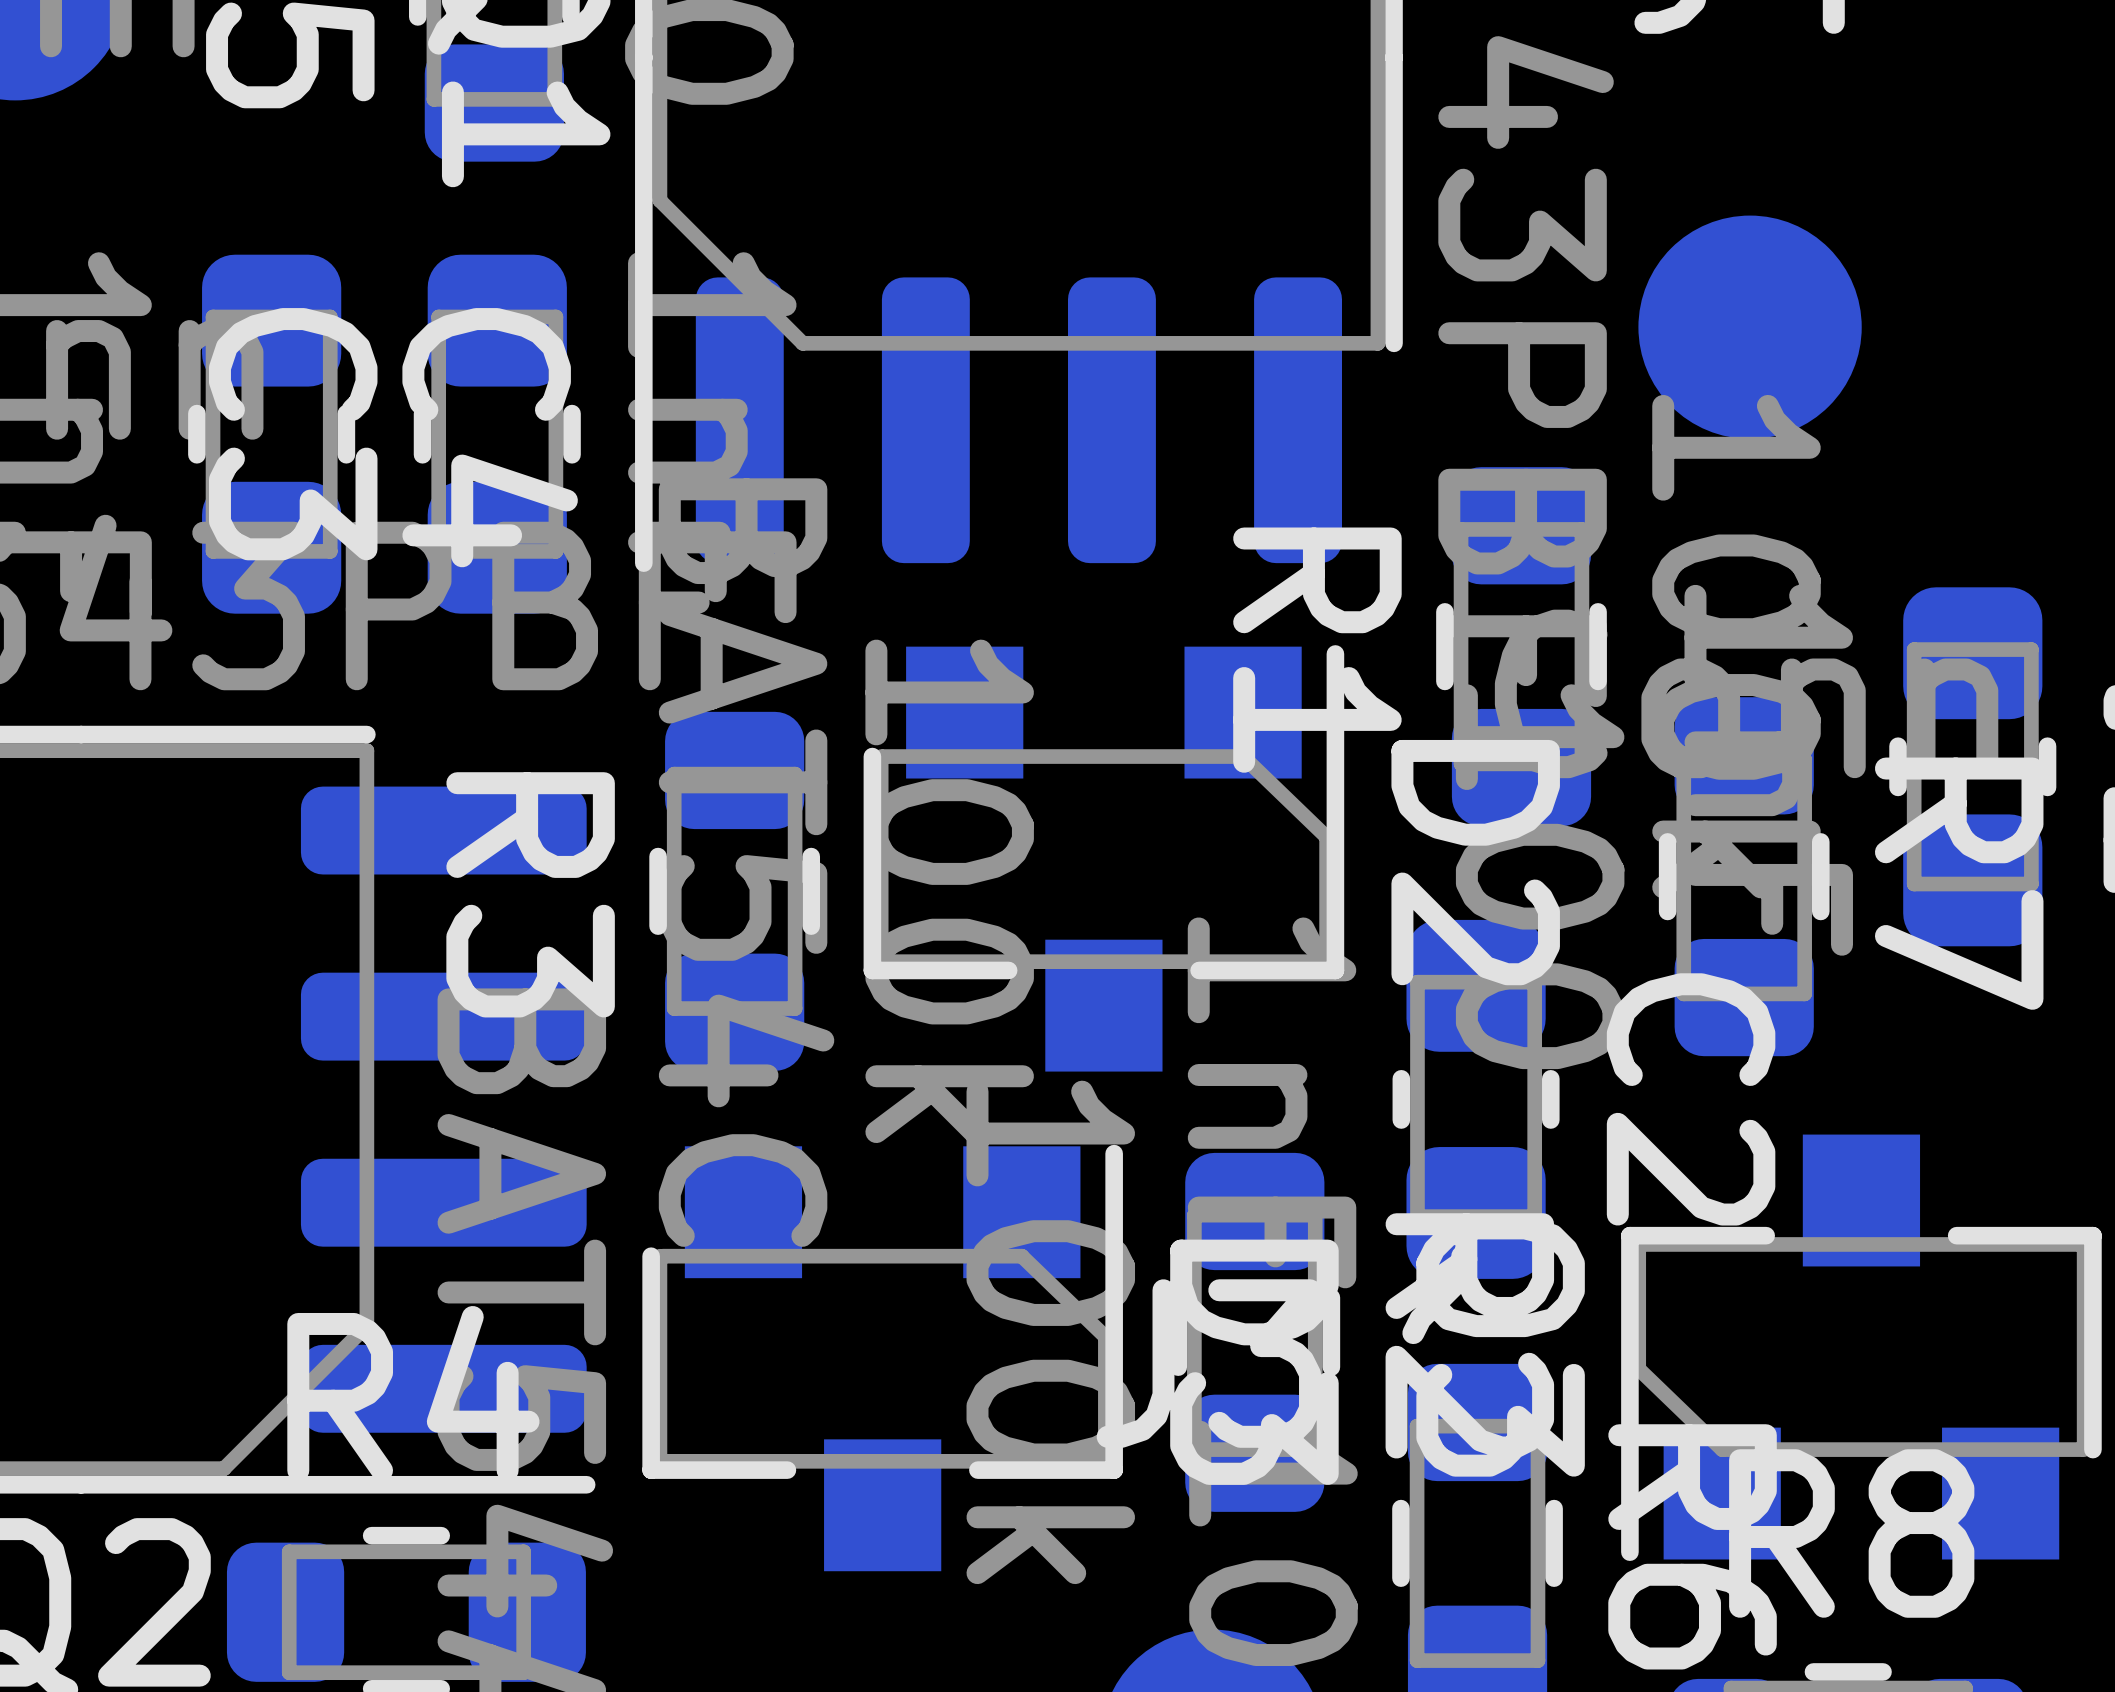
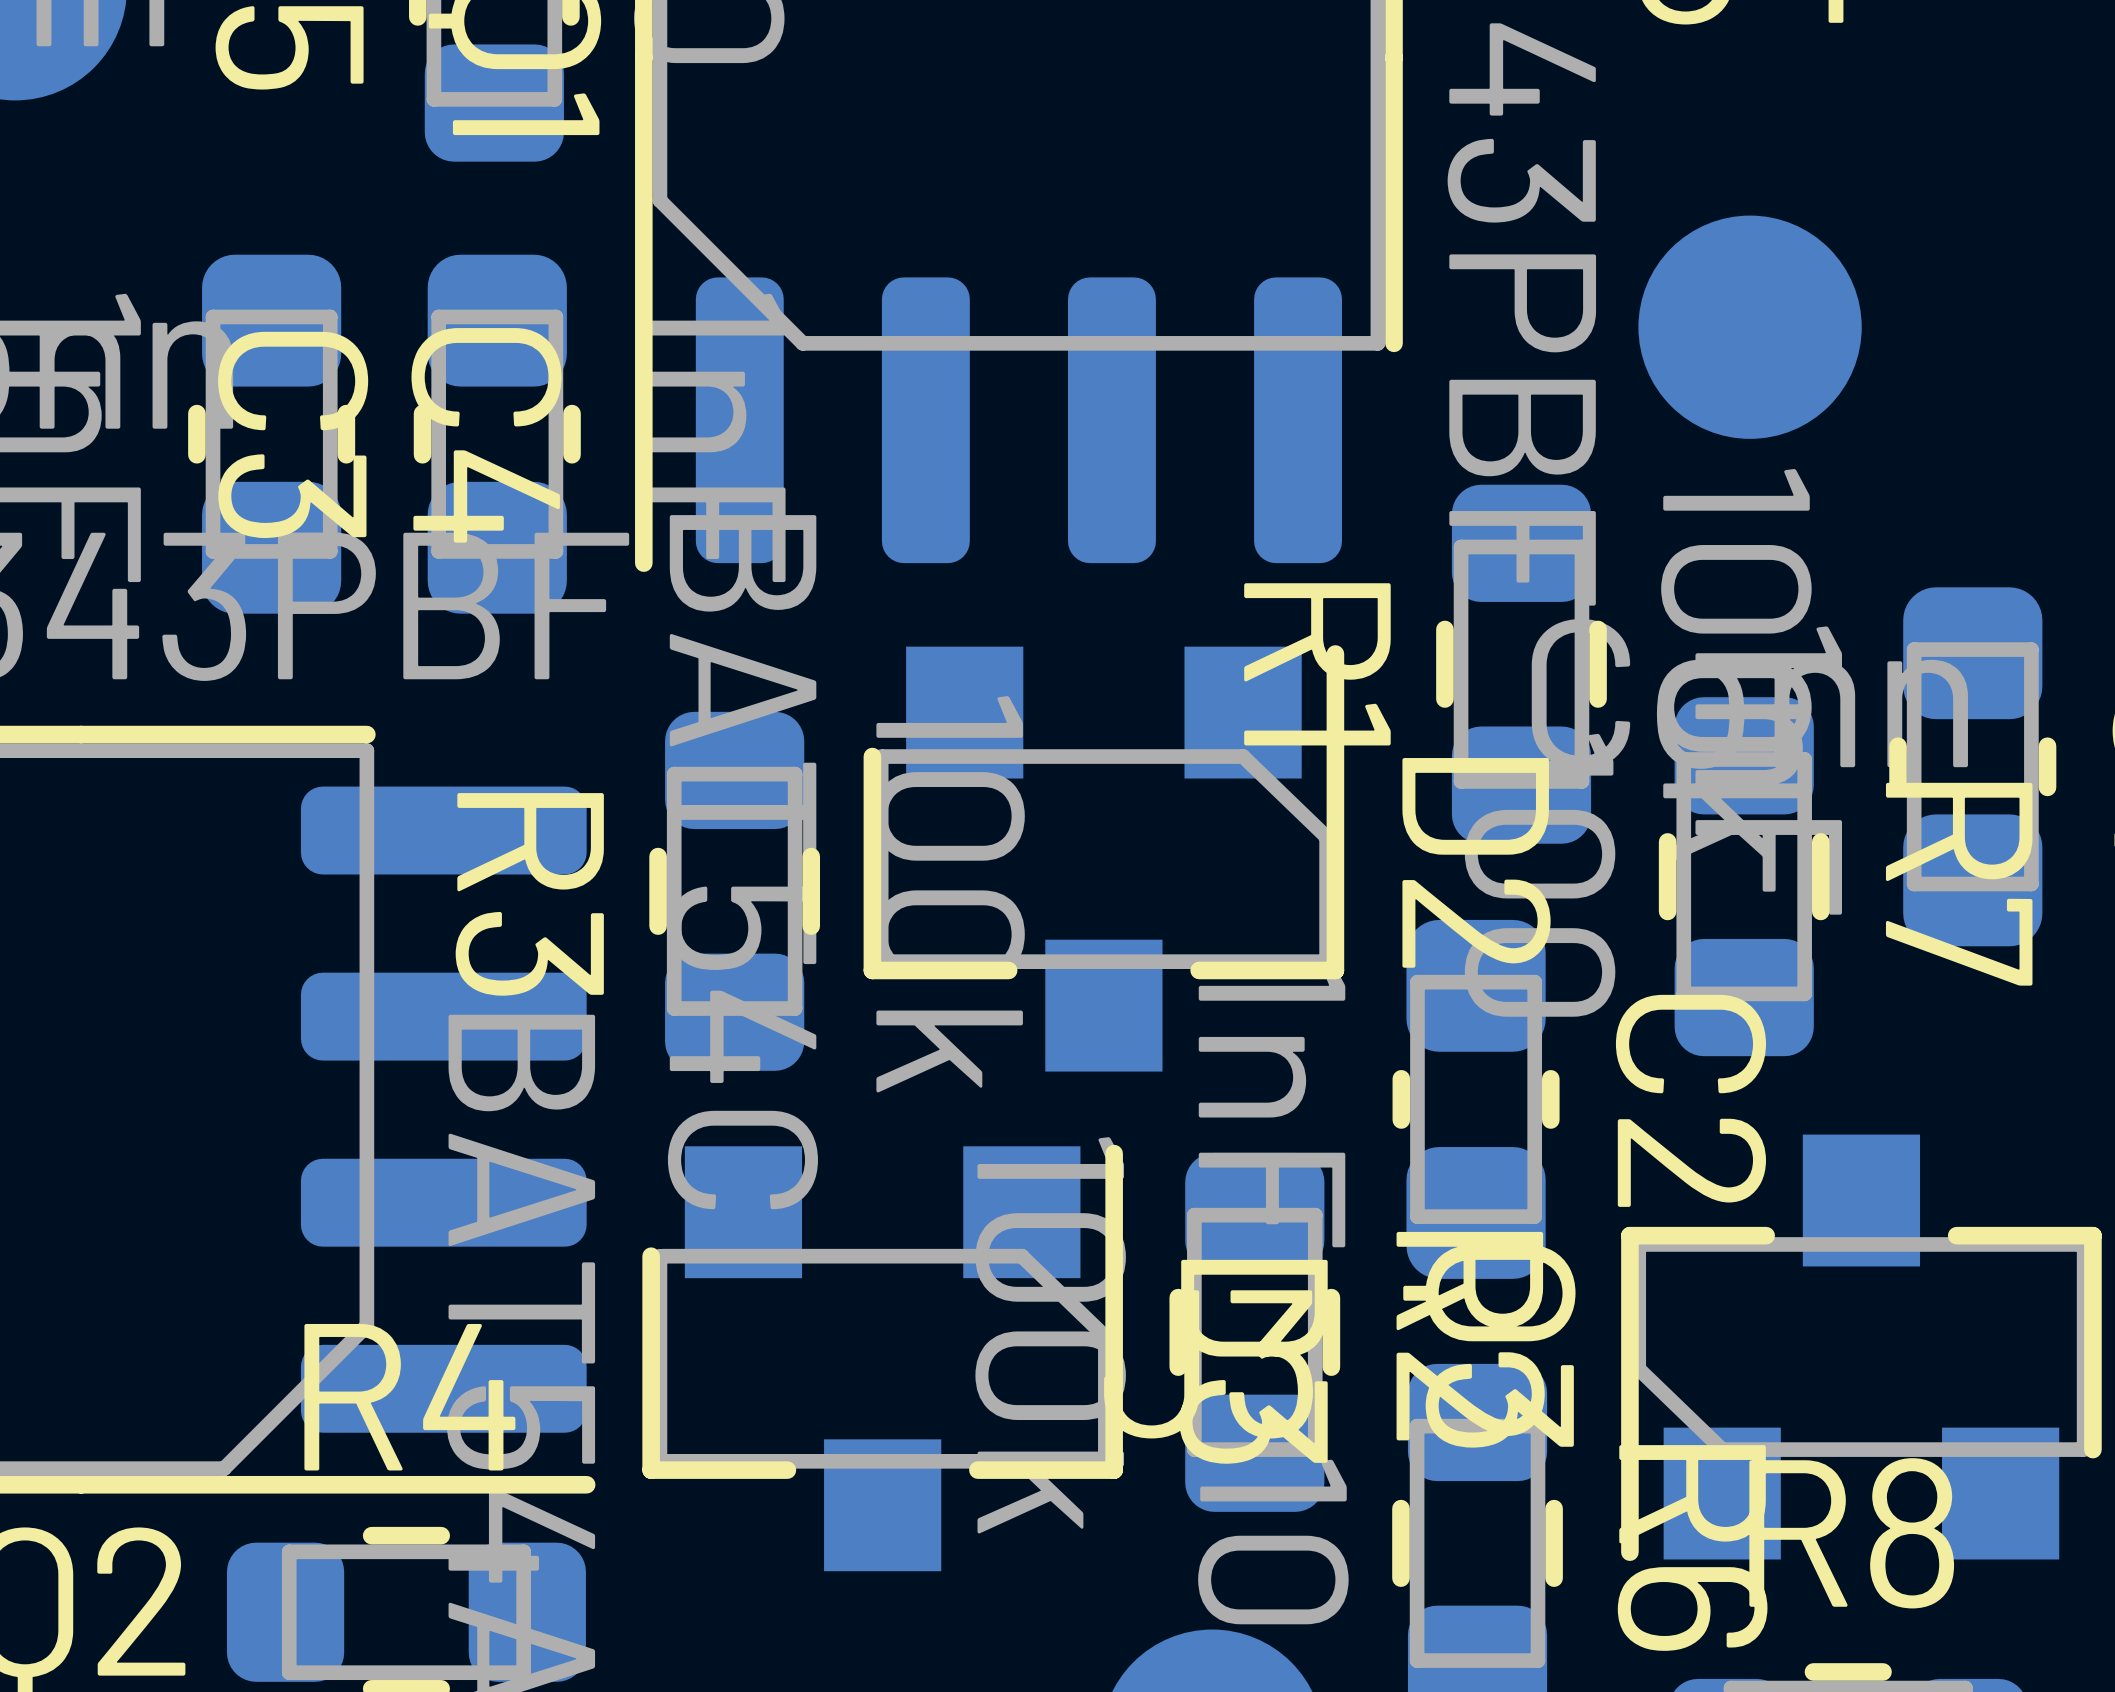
R1 position: (1521, 646) -> (1521, 664)

